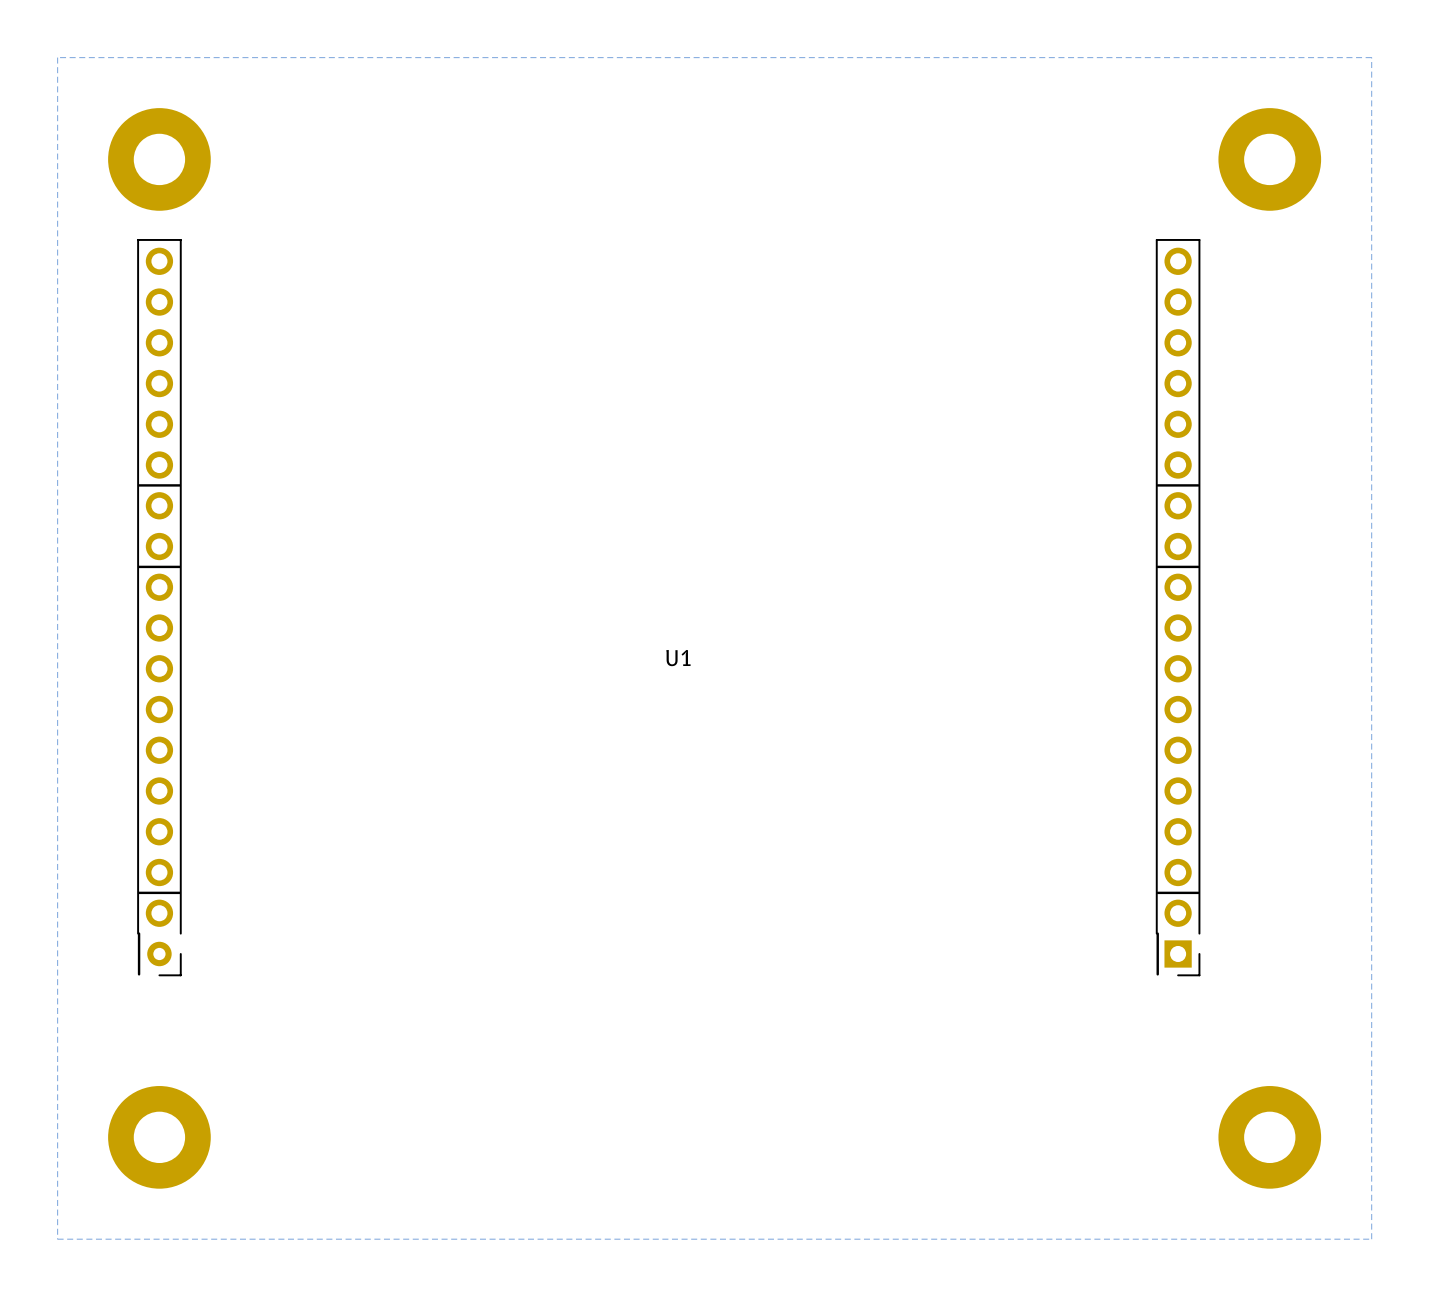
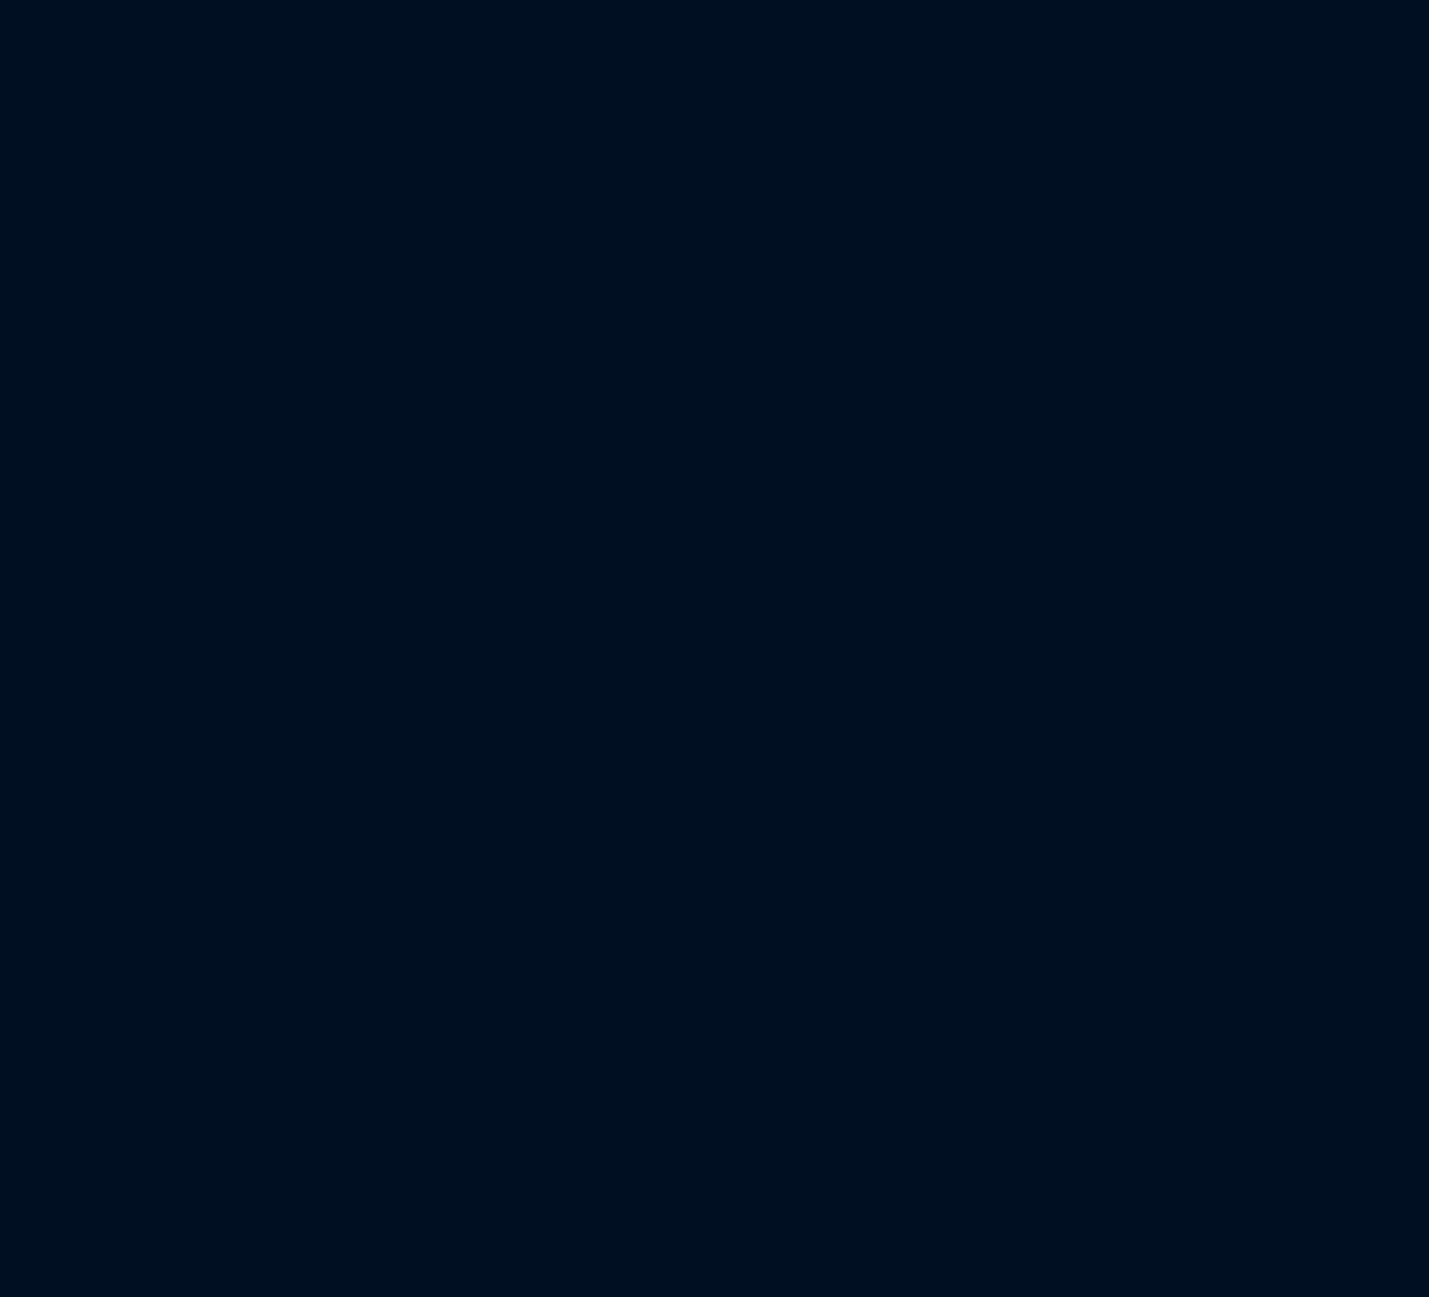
zone outline: (1371, 57) (1371, 1239) (57, 1239) (57, 57) (1371, 57) -> none
part: (159, 159) -> none
part: (1269, 159) -> none
U1: (668, 607) -> none
part: (159, 1137) -> none
part: (1269, 1137) -> none

